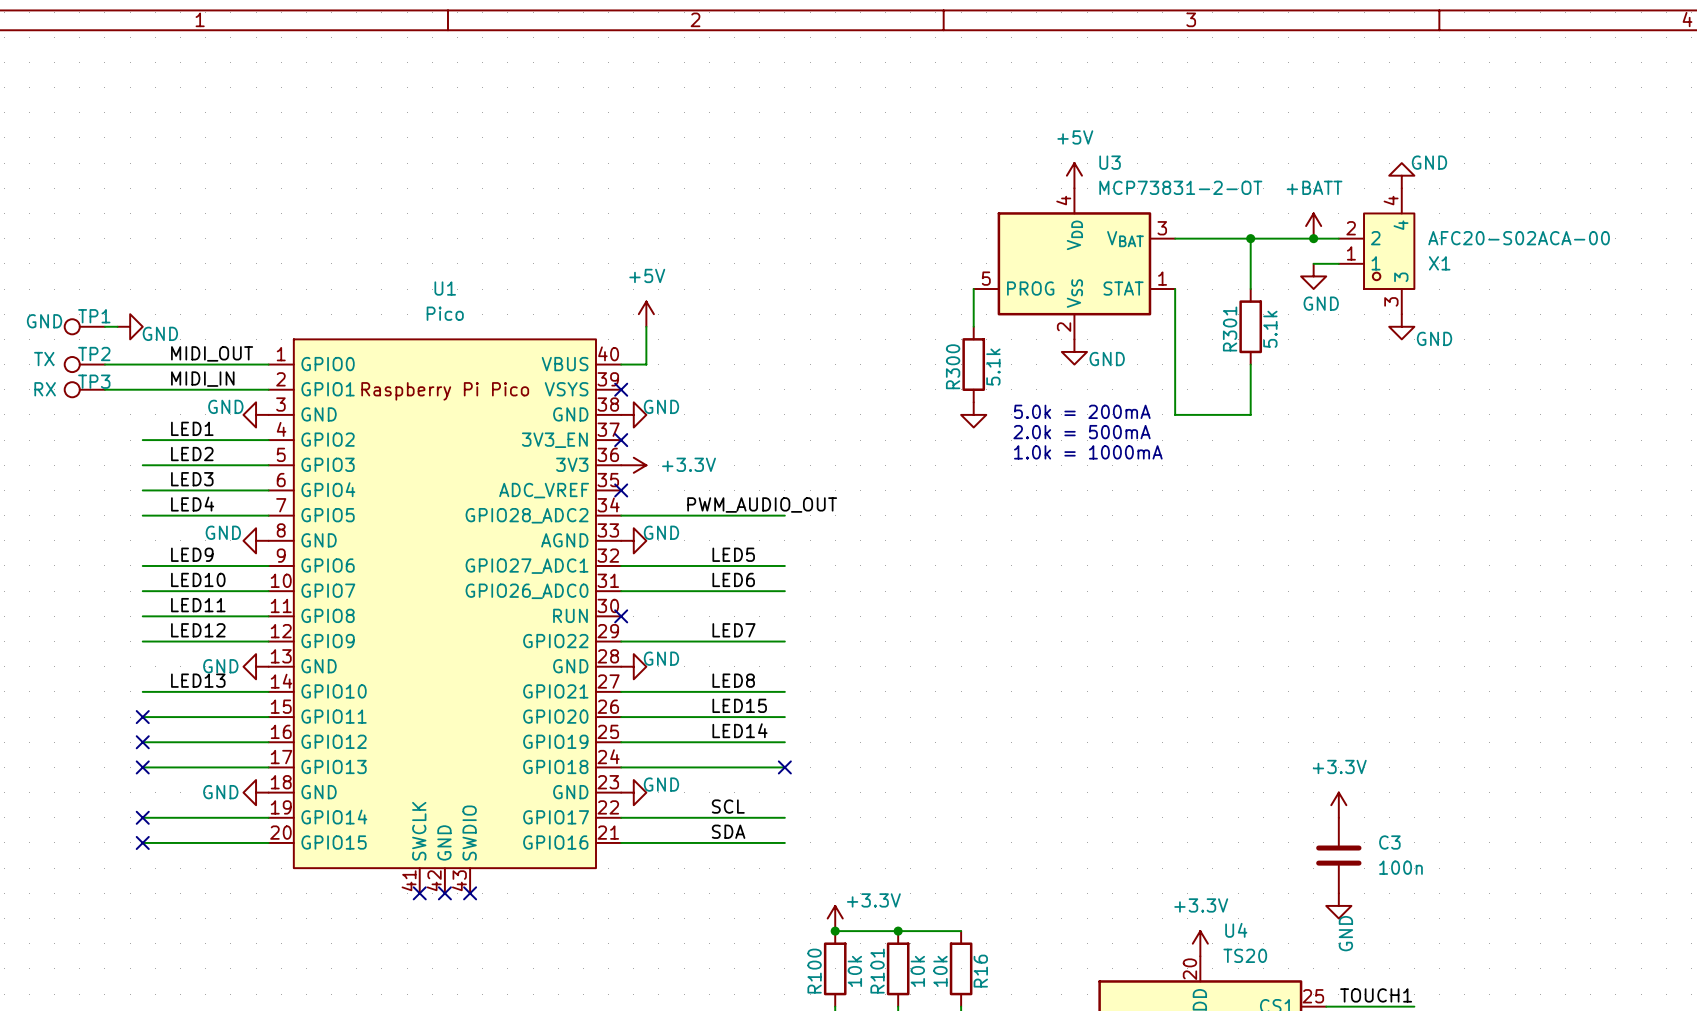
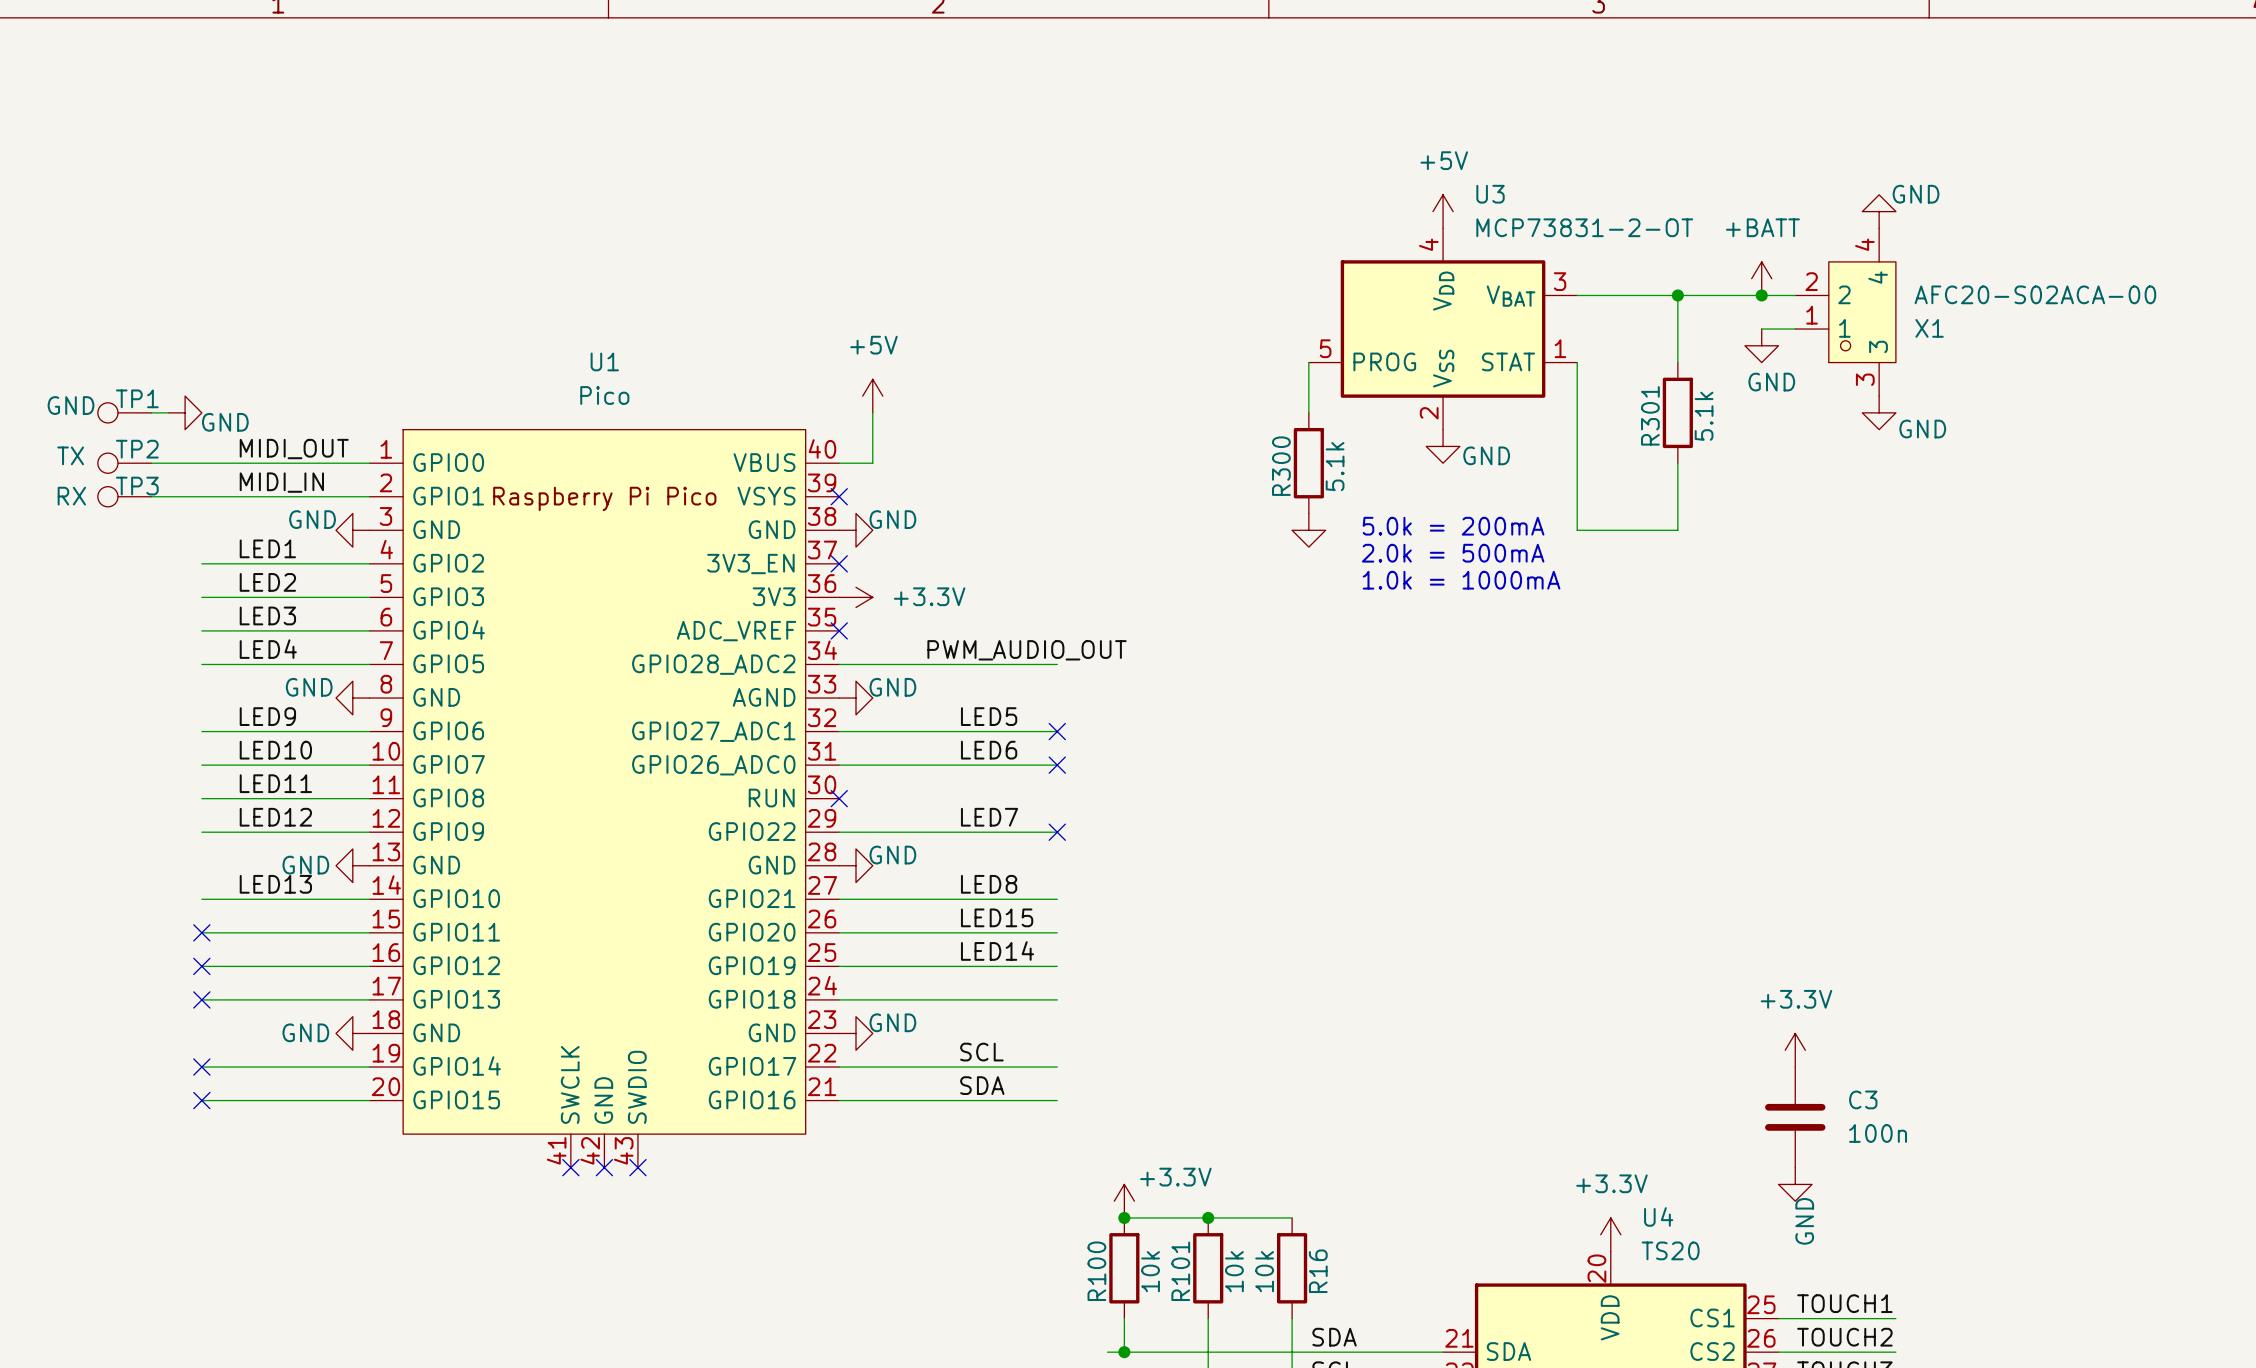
no-connect mark: none -> (1057, 731)
no-connect mark: none -> (1057, 765)
no-connect mark: none -> (1057, 832)
no-connect mark: (784, 767) -> none

